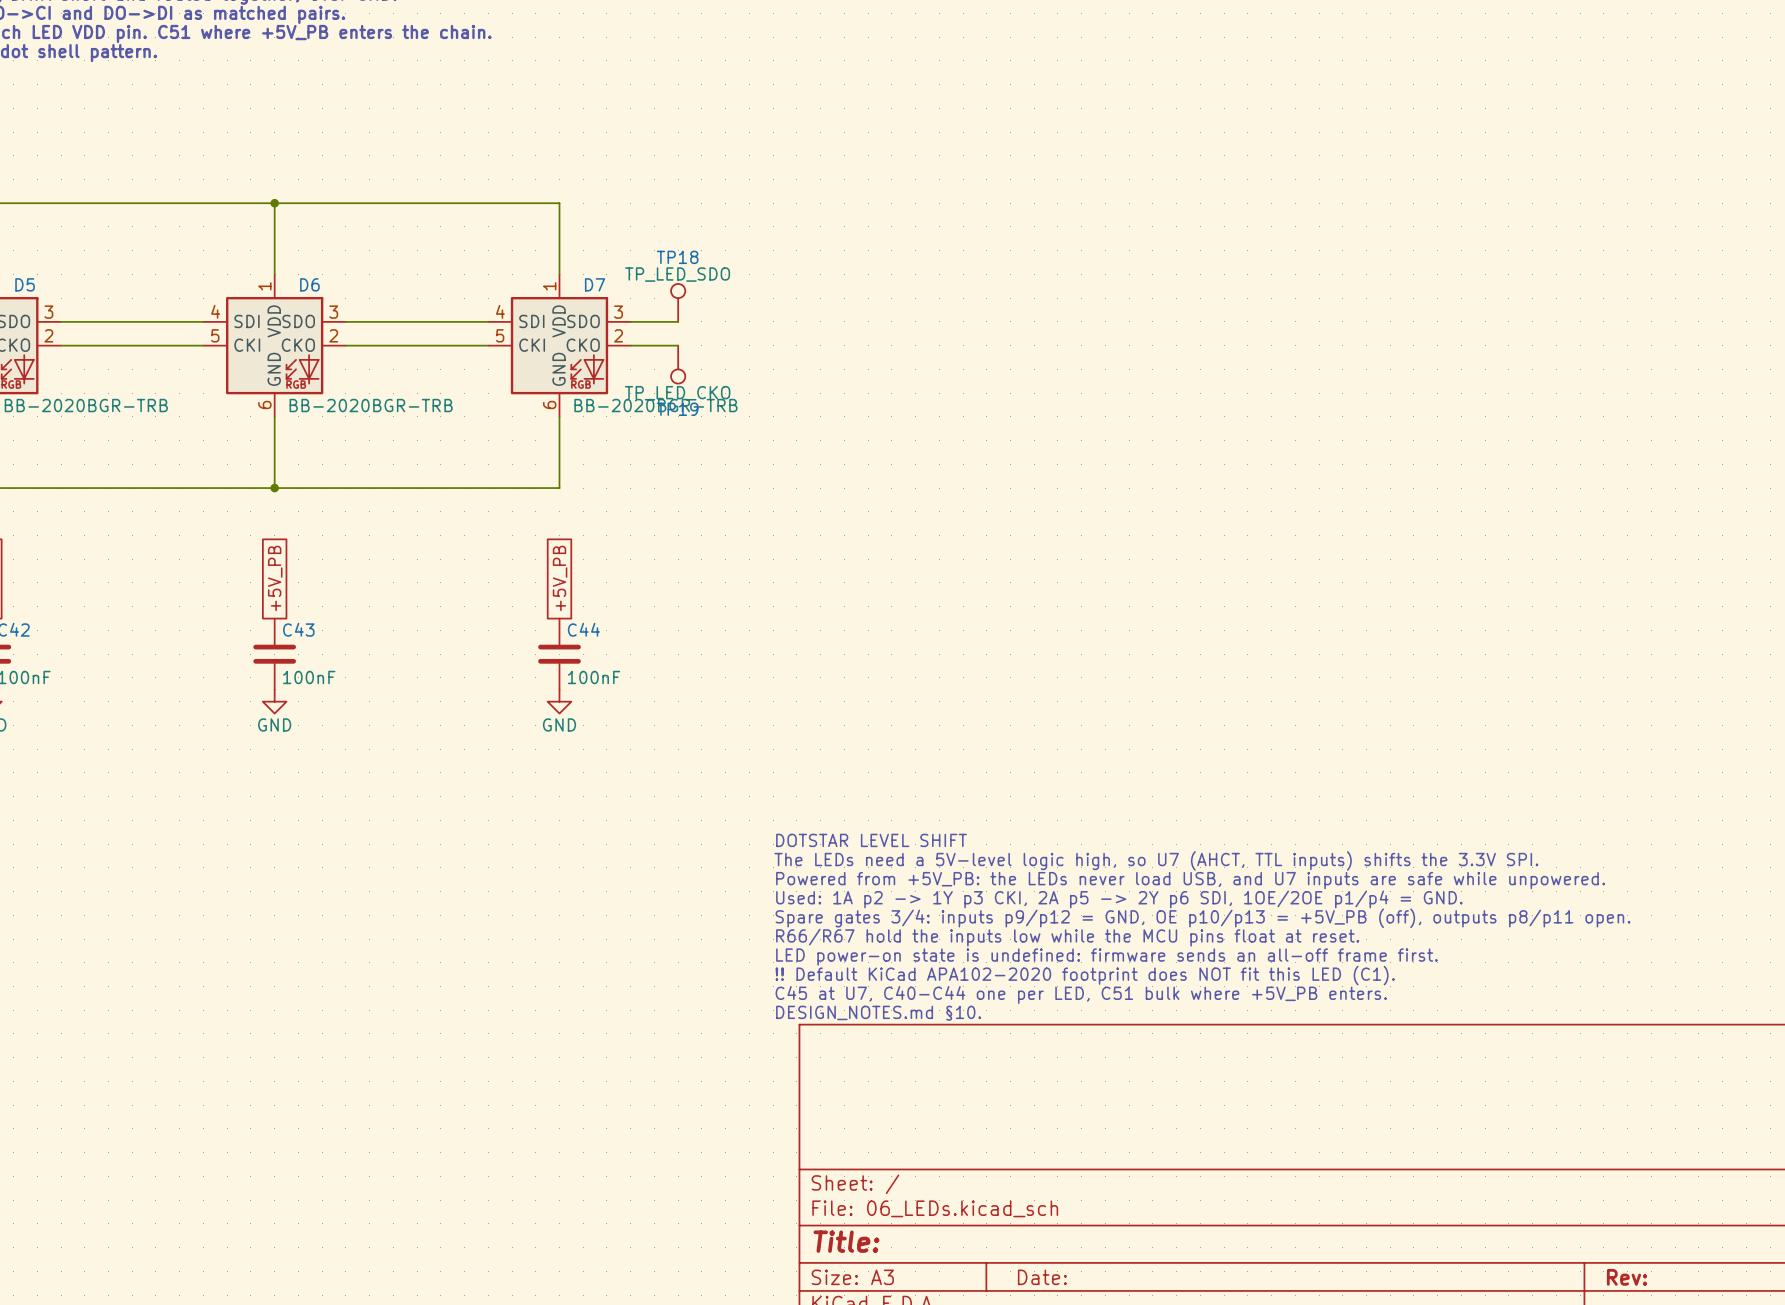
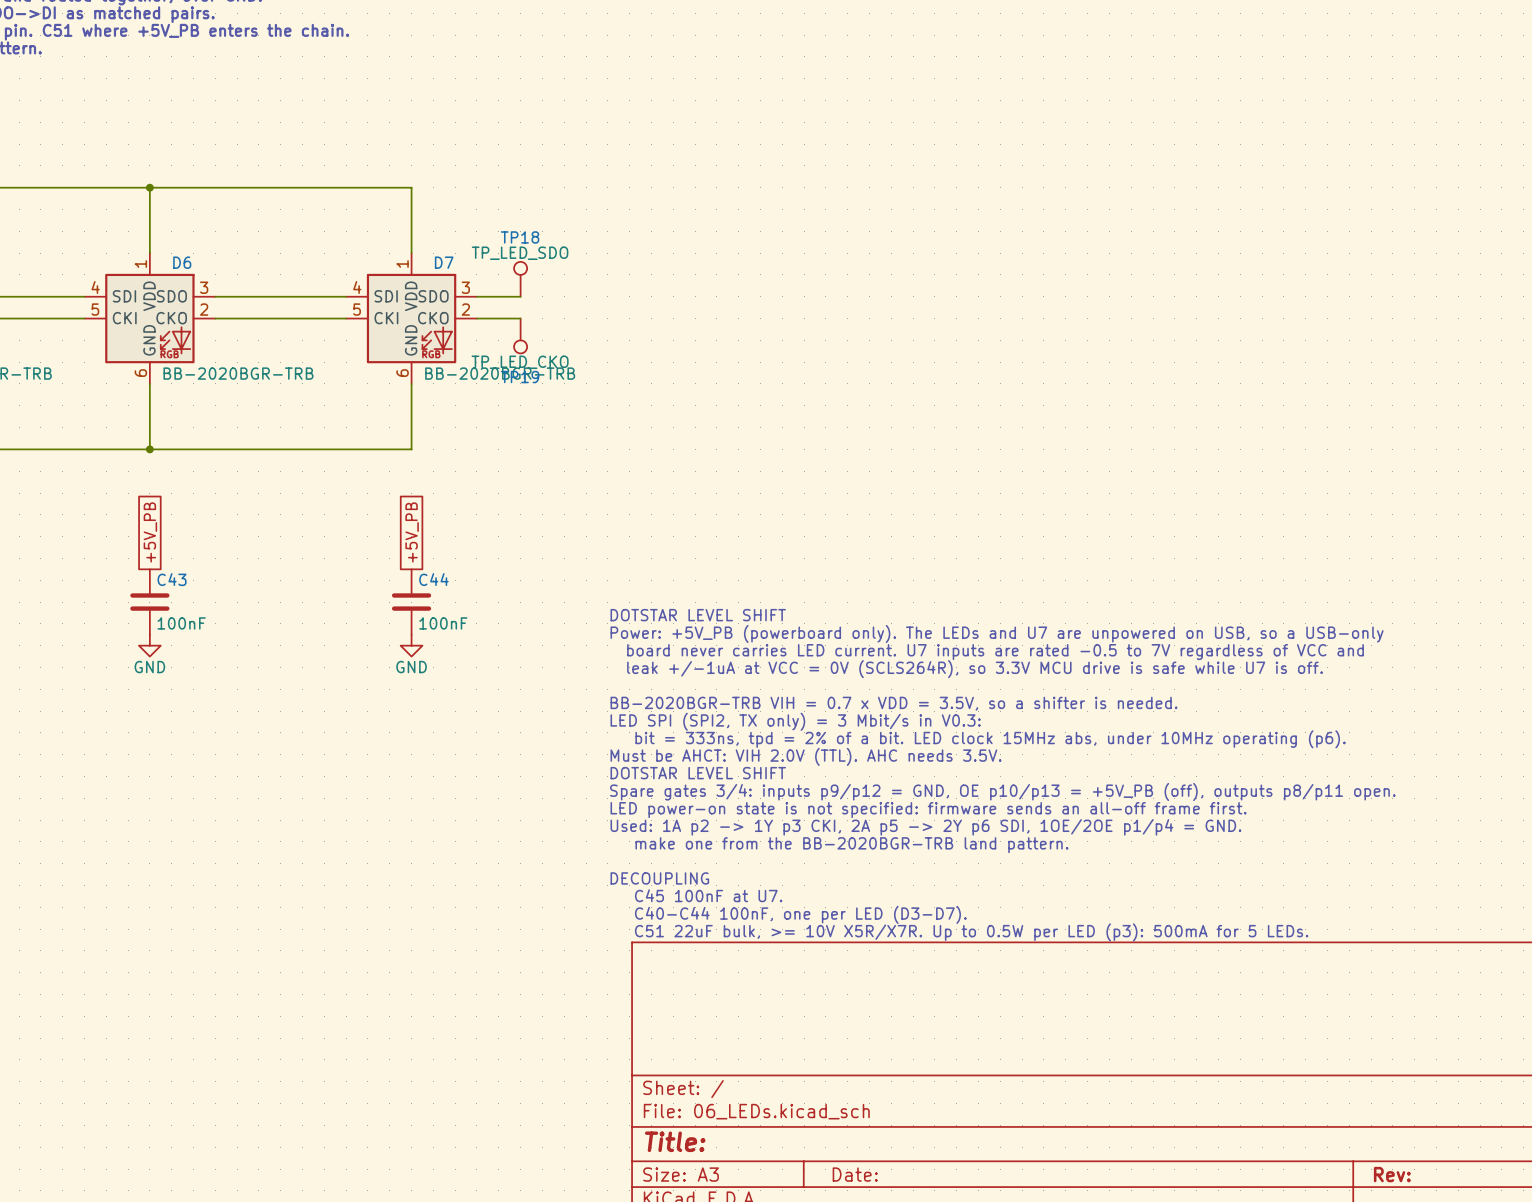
text: none -> DOTSTAR LEVEL SHIFT (698, 615)
text: none -> Power: +5V_PB (powerboard only). The LEDs and U7 are unpowered on USB, so a USB-only (997, 633)
text: none -> board never carries LED current. U7 inputs are rated -0.5 to 7V regardless of VCC and (995, 652)
text: none -> leak +/-1uA at VCC = 0V (SCLS264R), so 3.3V MCU drive is safe while U7 is off. (975, 669)
text: none -> BB-2020BGR-TRB VIH = 0.7 x VDD = 3.5V, so a shifter is needed. (894, 703)
text: none -> LED SPI (SPI2, TX only) = 3 Mbit/s in V0.3: (795, 721)
text: none -> bit = 333ns, tpd = 2% of a bit. LED clock 15MHz abs, under 10MHz operating (p6). (990, 739)
text: none -> Must be AHCT: VIH 2.0V (TTL). AHC needs 3.5V. (805, 756)
text: The LEDs need a 5V-level logic high, so U7 (AHCT, TTL inputs) shifts the 3.3V SPI. (1156, 860) -> Spare gates 3/4: inputs p9/p12 = GND, OE p10/p13 = +5V_PB (off), outputs p8/p11 open. (1002, 791)
text: Powered from +5V_PB: the LEDs never load USB, and U7 inputs are safe while unpowered. (1190, 880) -> LED power-on state is not specified: firmware sends an all-off frame first. (928, 810)
text: Spare gates 3/4: inputs p9/p12 = GND, OE p10/p13 = +5V_PB (off), outputs p8/p11 open. (1202, 918) -> make one from the BB-2020BGR-TRB land pattern. (851, 845)
text: R66/R67 hold the inputs low while the MCU pins float at reset. (1067, 937) -> none
text: LED power-on state is undefined: firmware sends an all-off frame first. (1106, 957) -> DECOUPLING (659, 878)
text: !! Default KiCad APA102-2020 footprint does NOT fit this LED (C1). (1085, 975) -> C45 100nF at U7. (708, 895)
text: C45 at U7, C40-C44 one per LED, C51 bulk where +5V_PB enters. (1081, 994) -> C40-C44 100nF, one per LED (D3-D7). (800, 914)
text: DESIGN_NOTES.md §10. (878, 1013) -> C51 22uF bulk, >= 10V X5R/X7R. Up to 0.5W per LED (p3): 500mA for 5 LEDs. (971, 932)

